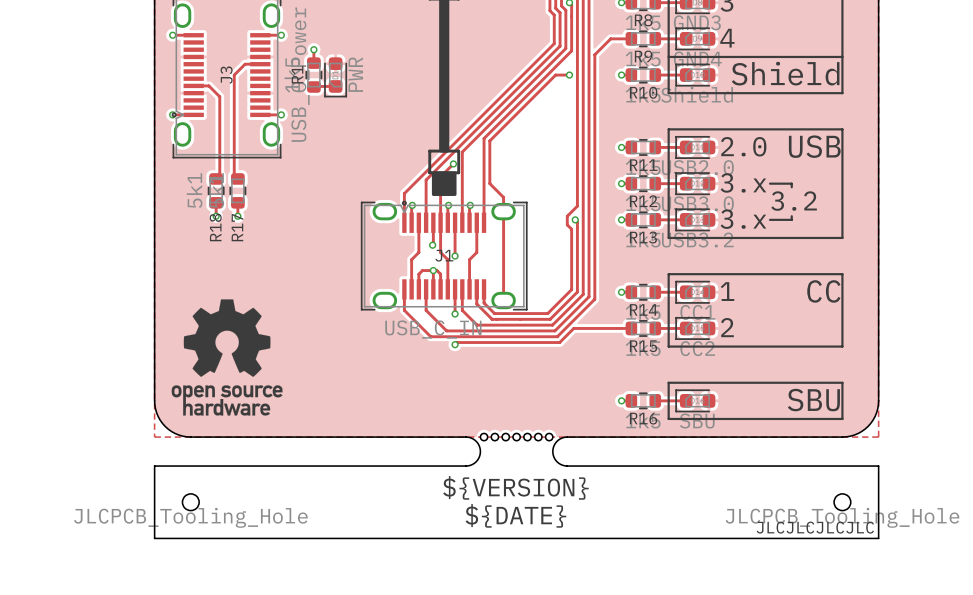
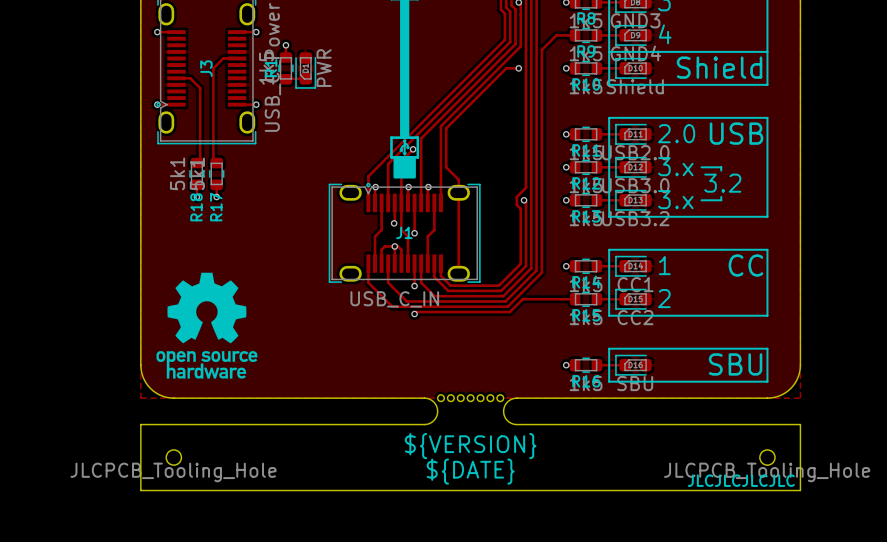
drawing: none -> [399, 139, 410, 156]
line: none -> (404, 140) (404, 154)
line: none -> (404, 143) (407, 146)
line: none -> (404, 145) (401, 148)

